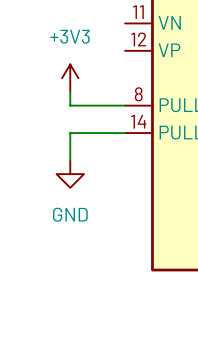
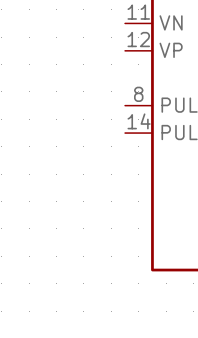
power symbol: +3V3 (70, 78) -> none
wire: (70, 91) (70, 105) (125, 105) -> none
wire: (125, 133) (70, 133) (70, 160) -> none
power symbol: GND (70, 174) -> none

